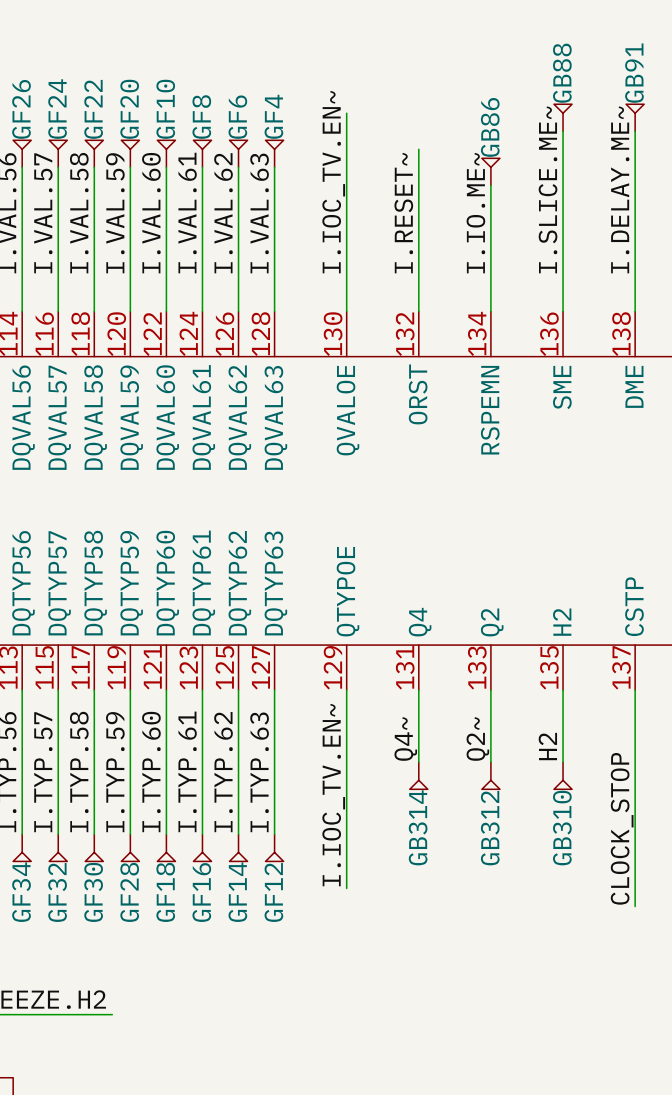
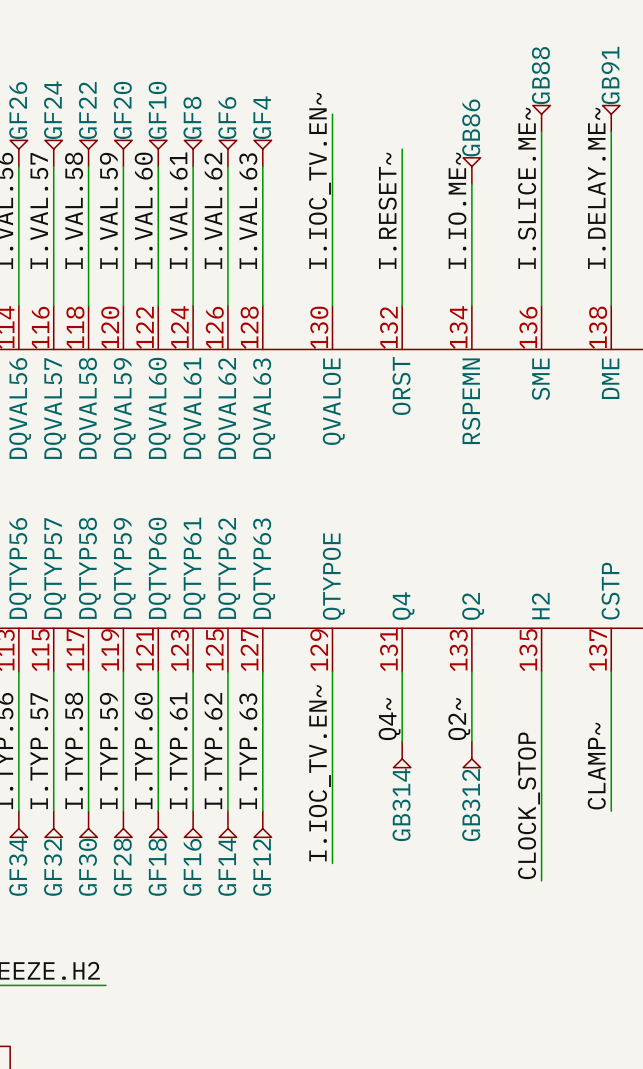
label: H2 (547, 746) -> none
wire: none -> (541, 741) (541, 880)
GB310: (563, 776) -> none
label: none -> CLAMP~ (596, 766)
label position: CLOCK_STOP (622, 828) -> CLOCK_STOP (529, 805)
wire: (635, 834) (635, 906) -> none

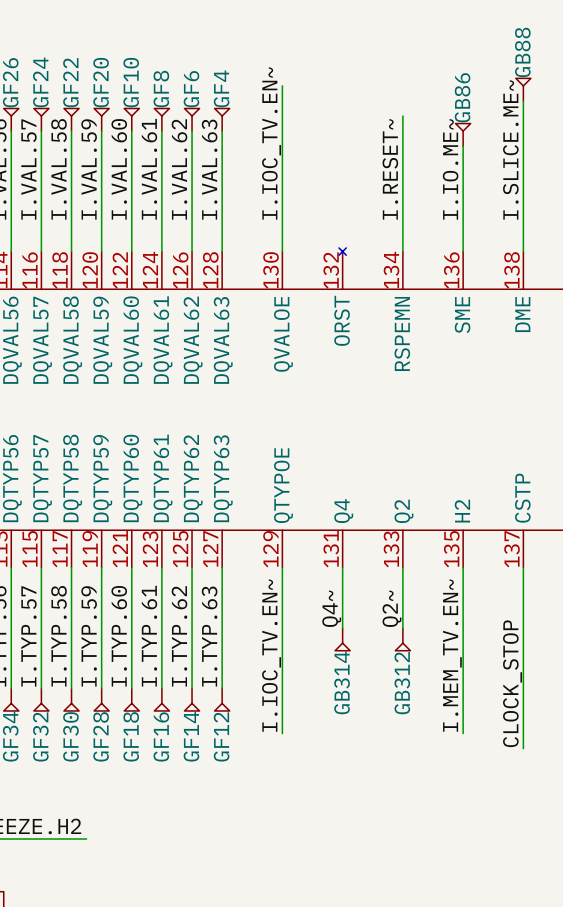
GB91 name: GB91 (610, 75) -> GB88 (522, 52)
GB88: (541, 118) -> none
wire: (402, 149) (402, 305) -> none
GB86 position: (471, 170) -> (463, 134)
label: I.SLICE.ME~ (527, 188) -> I.IO.ME~ (450, 169)
label: I.DELAY.ME~ (596, 188) -> I.SLICE.ME~ (510, 149)
label: I.RESET~ (387, 210) -> none
label: I.IO.ME~ (457, 210) -> I.RESET~ (390, 169)
no-connect mark: none -> (342, 251)
label: CLAMP~ (596, 766) -> none
label: none -> I.MEM_TV.EN~ (452, 655)
label position: CLOCK_STOP (529, 805) -> CLOCK_STOP (512, 683)
wire: none -> (523, 688) (523, 748)
wire: (541, 863) (541, 880) -> none

